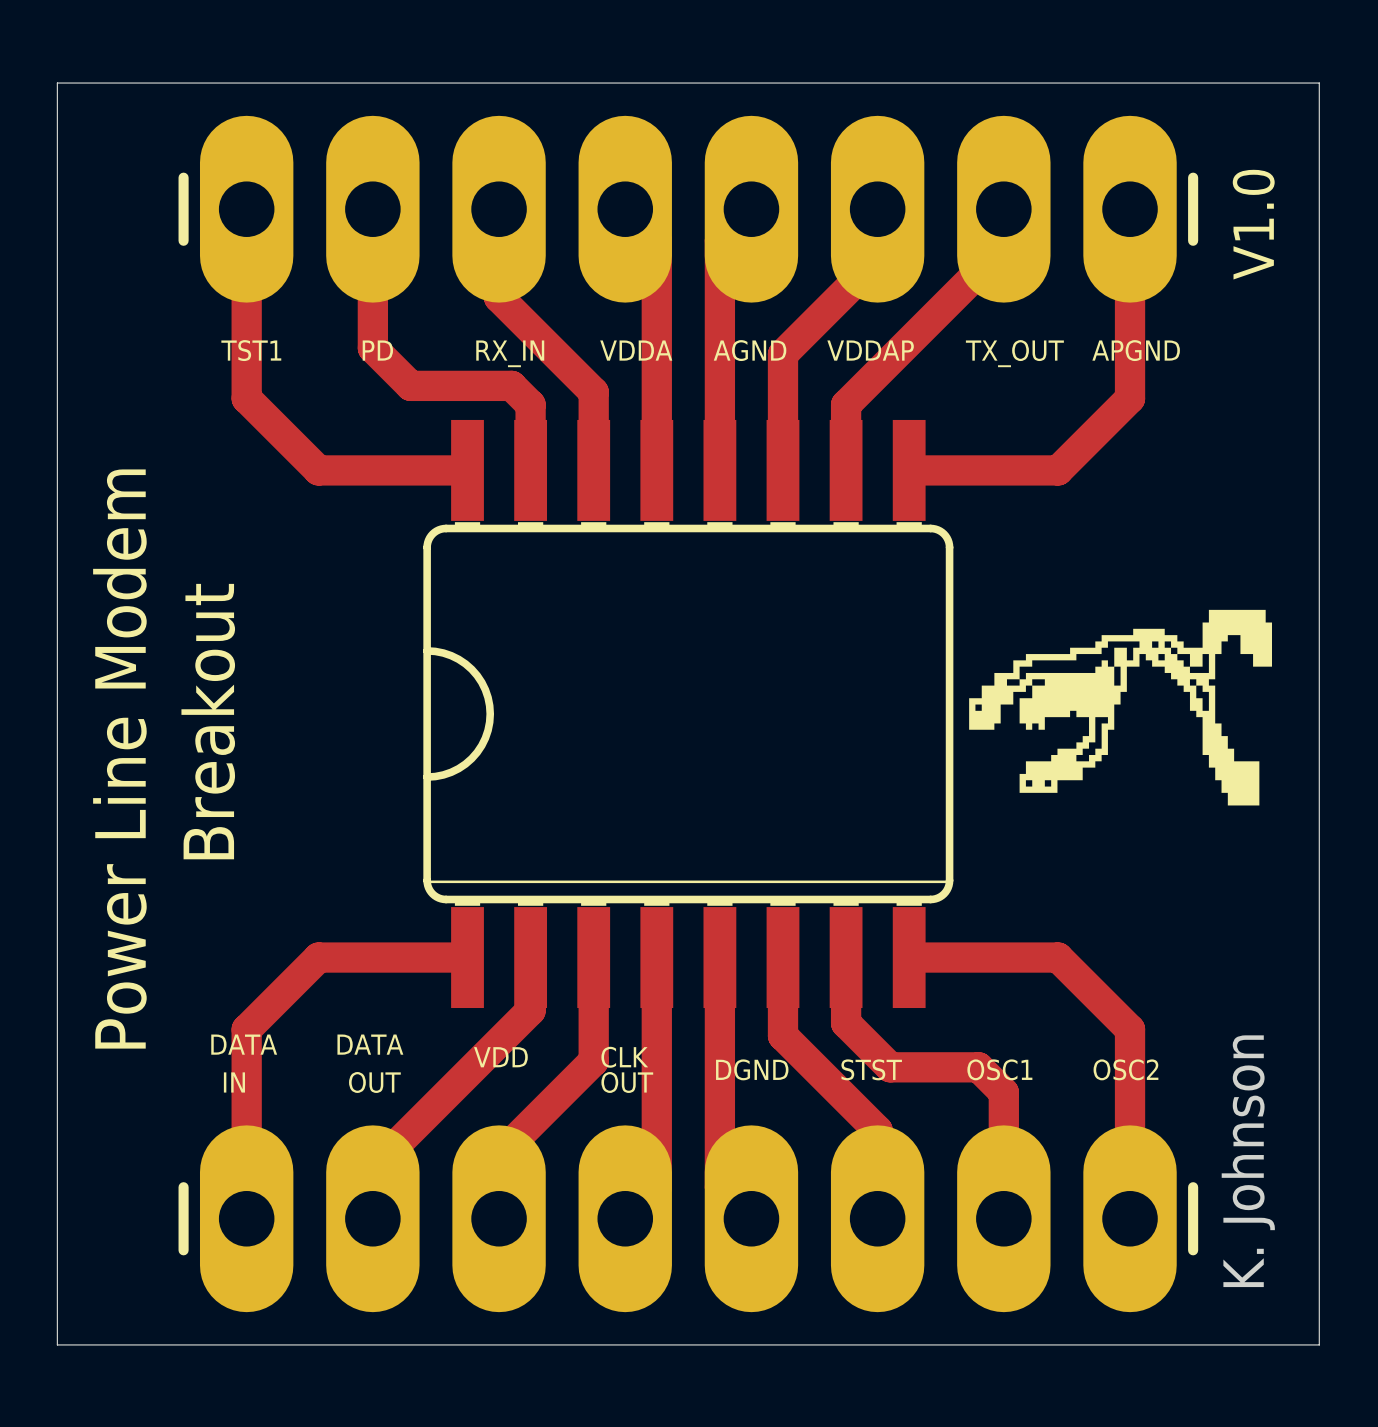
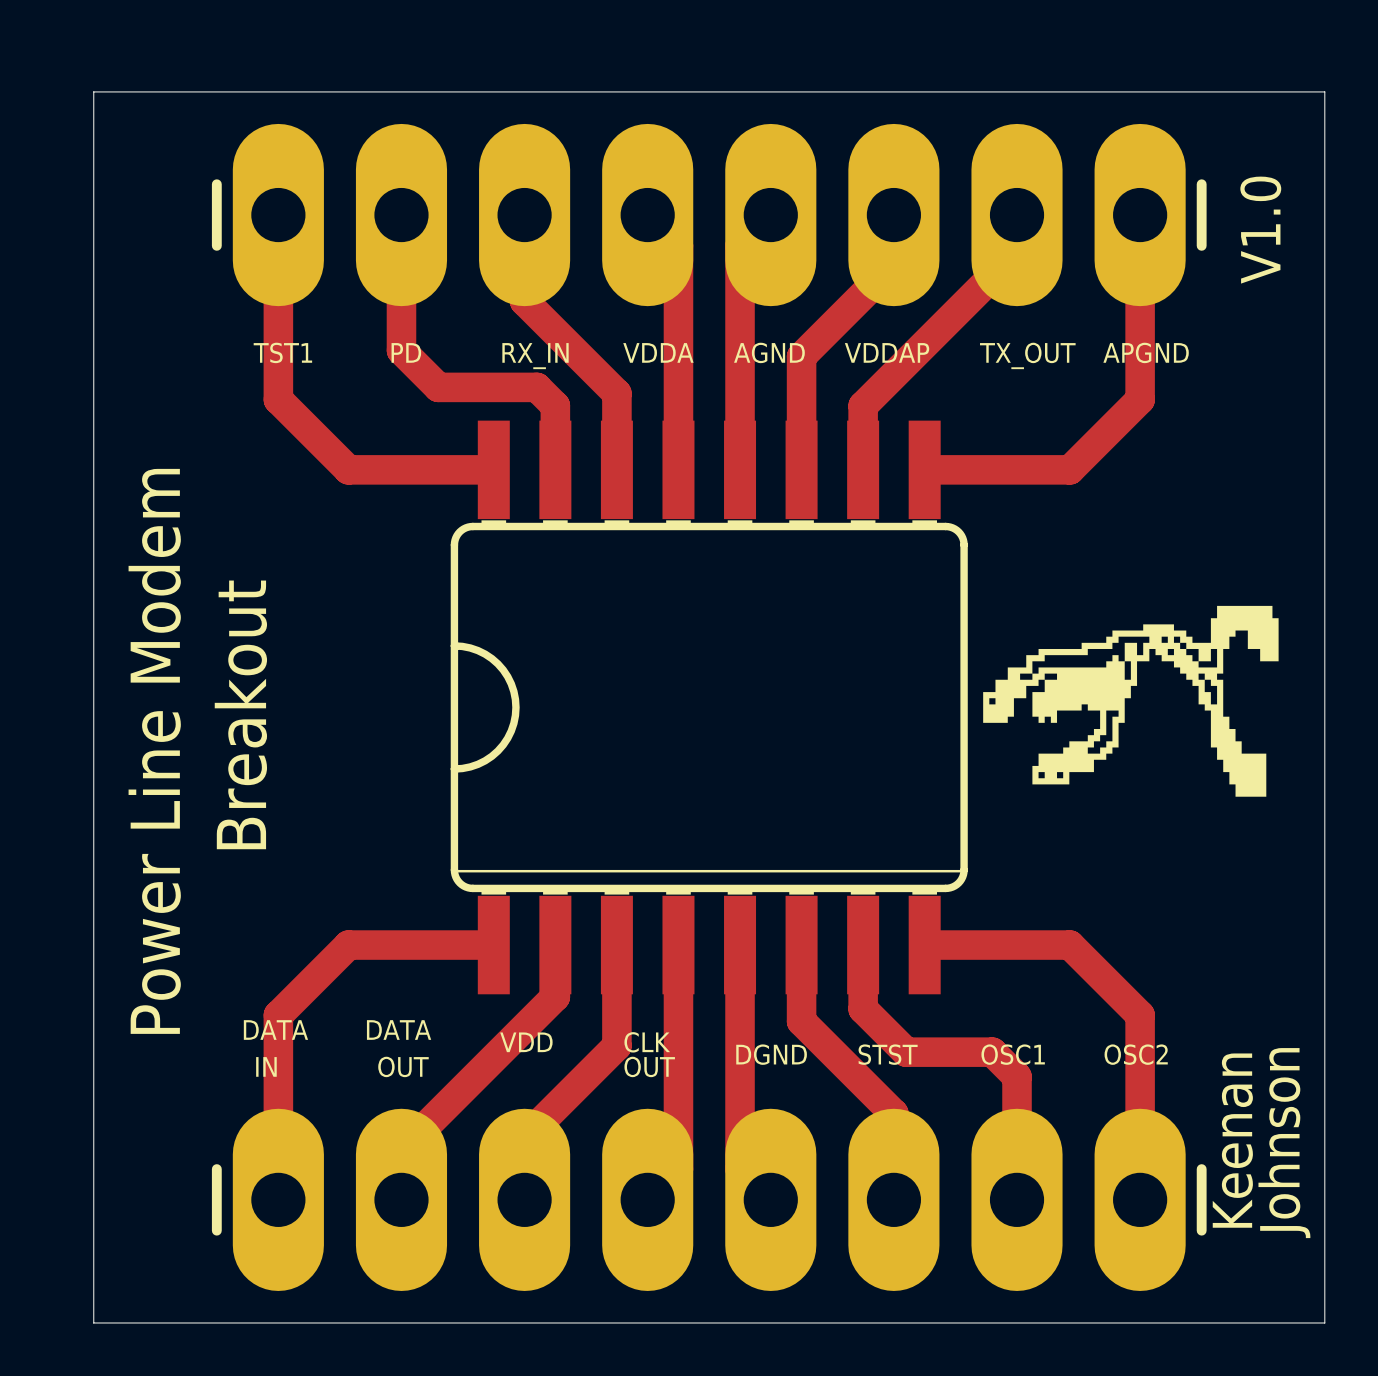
text: none -> Keenan (1232, 1140)
text: K. Johnson (1248, 1161) -> Johnson (1284, 1143)

